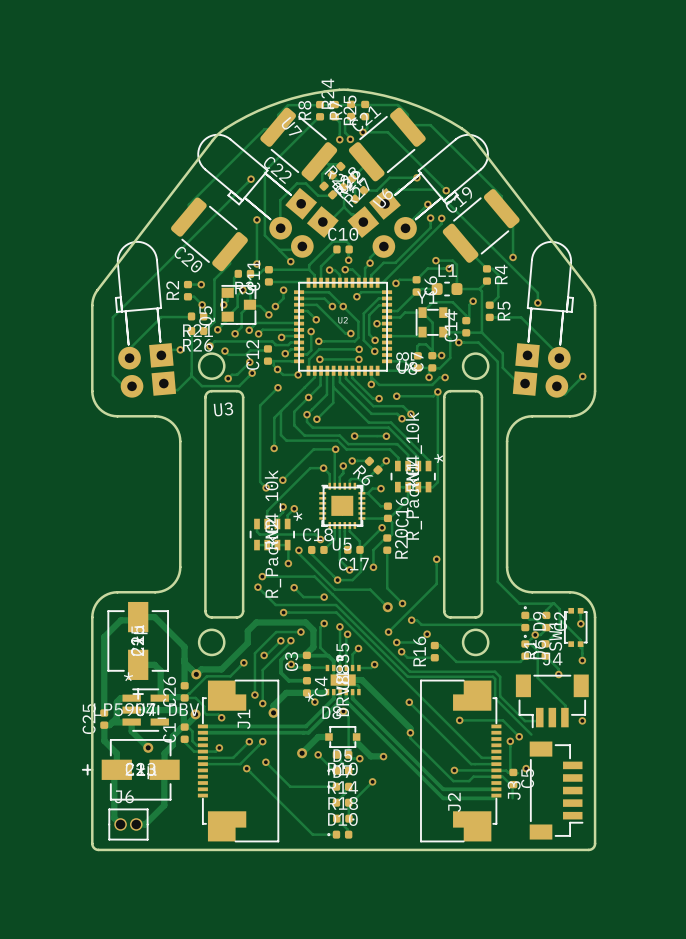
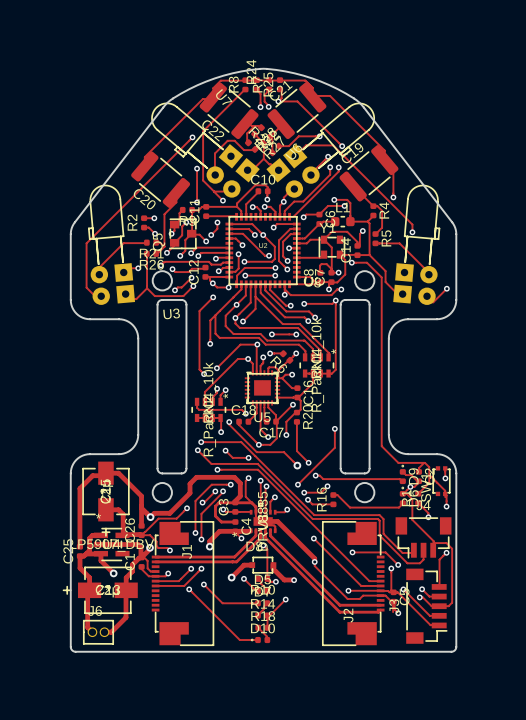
track: none -> (433, 543) (446, 543) (452, 548) (452, 602) (448, 606) (431, 606) (422, 597) (419, 597)
track: none -> (423, 550) (423, 559) (419, 563) (407, 563)
track: none -> (446, 552) (439, 559) (439, 586)
track: none -> (403, 589) (429, 615) (439, 615)
track: none -> (422, 589) (429, 596) (439, 596)
via: none -> (422, 589)
track: none -> (393, 592) (397, 592) (430, 625) (436, 625)
via: none -> (419, 597)
track: none -> (394, 600) (394, 609) (398, 613)
via: none -> (398, 613)

